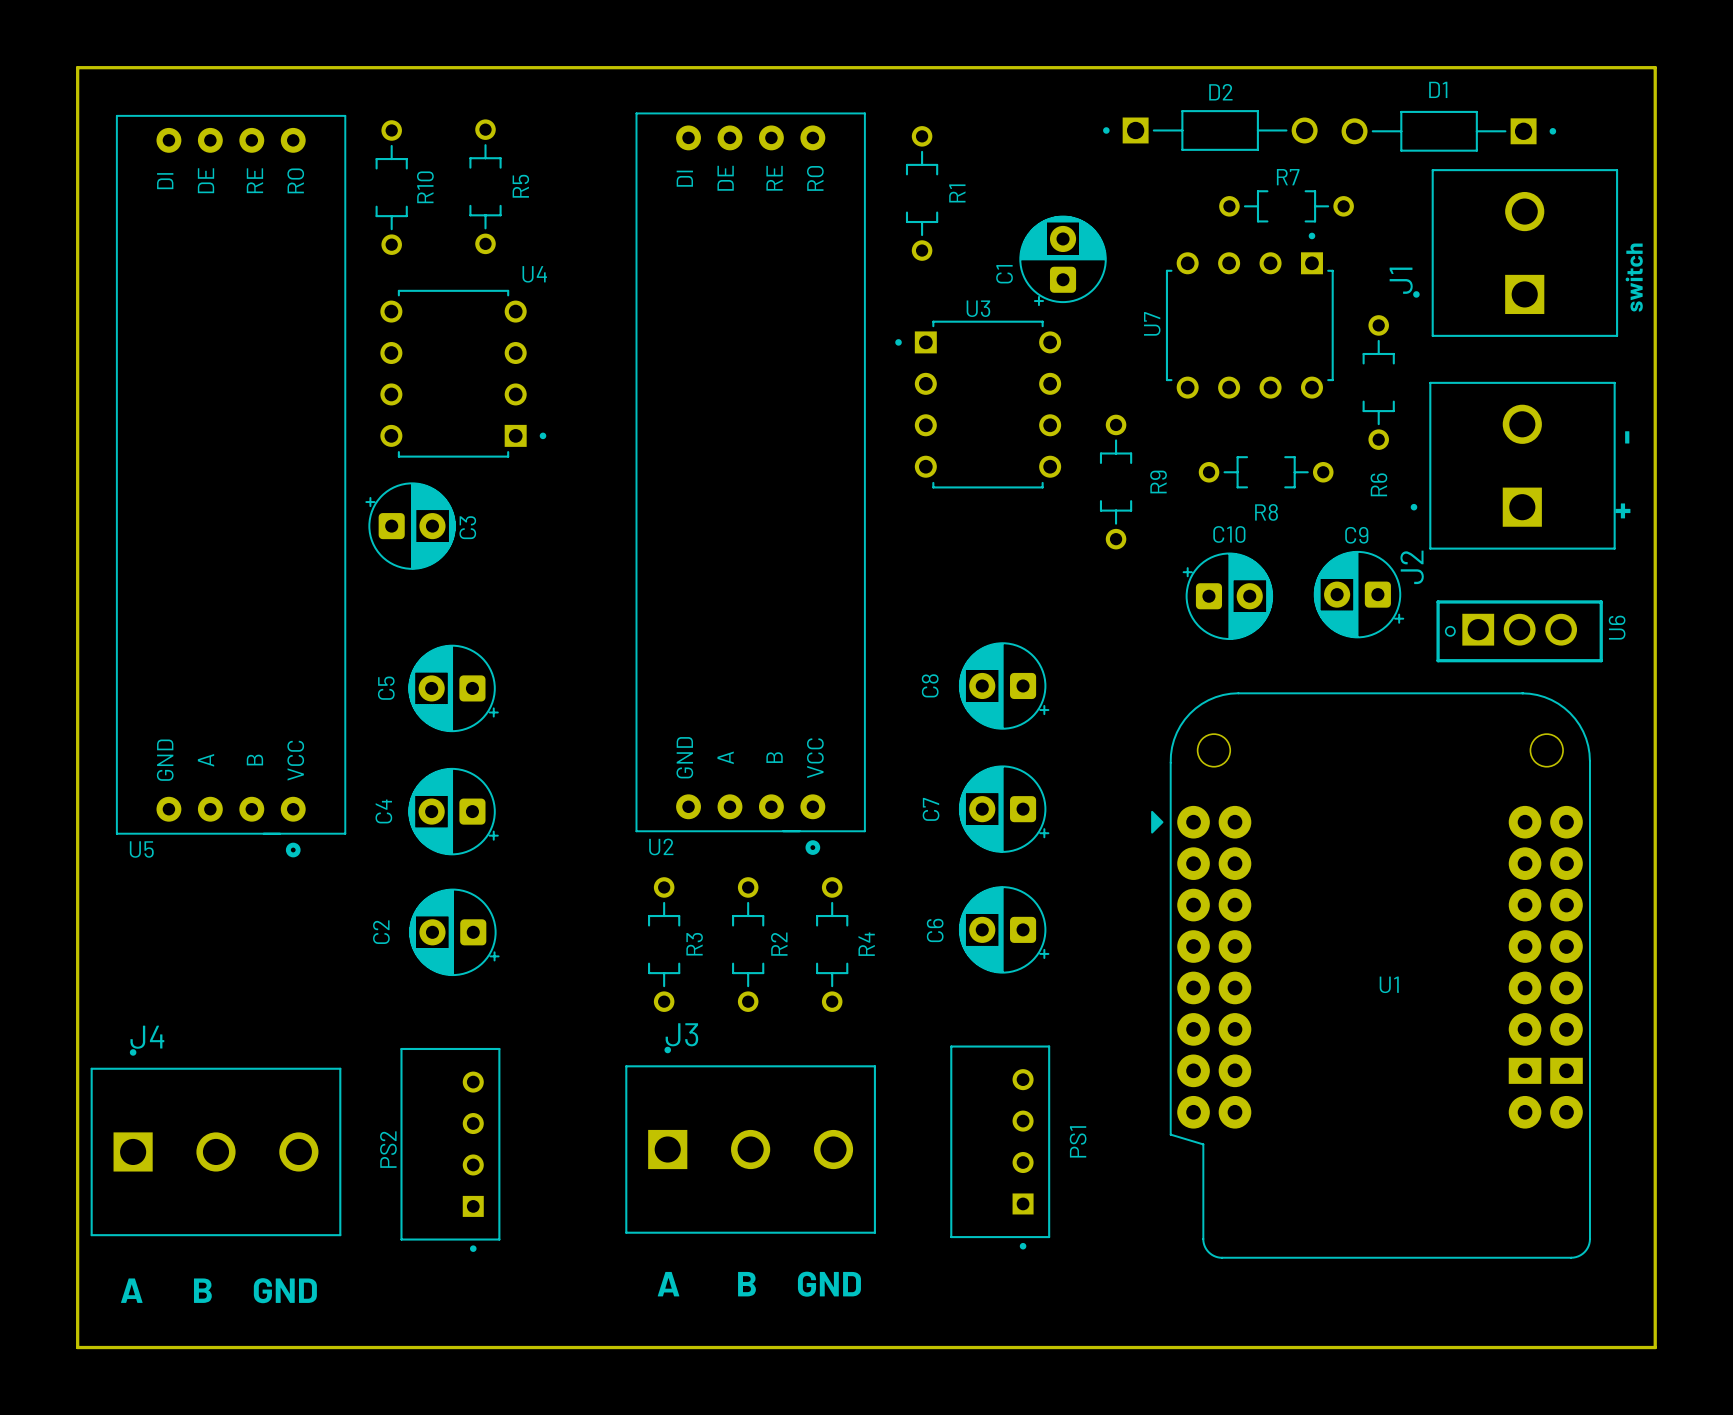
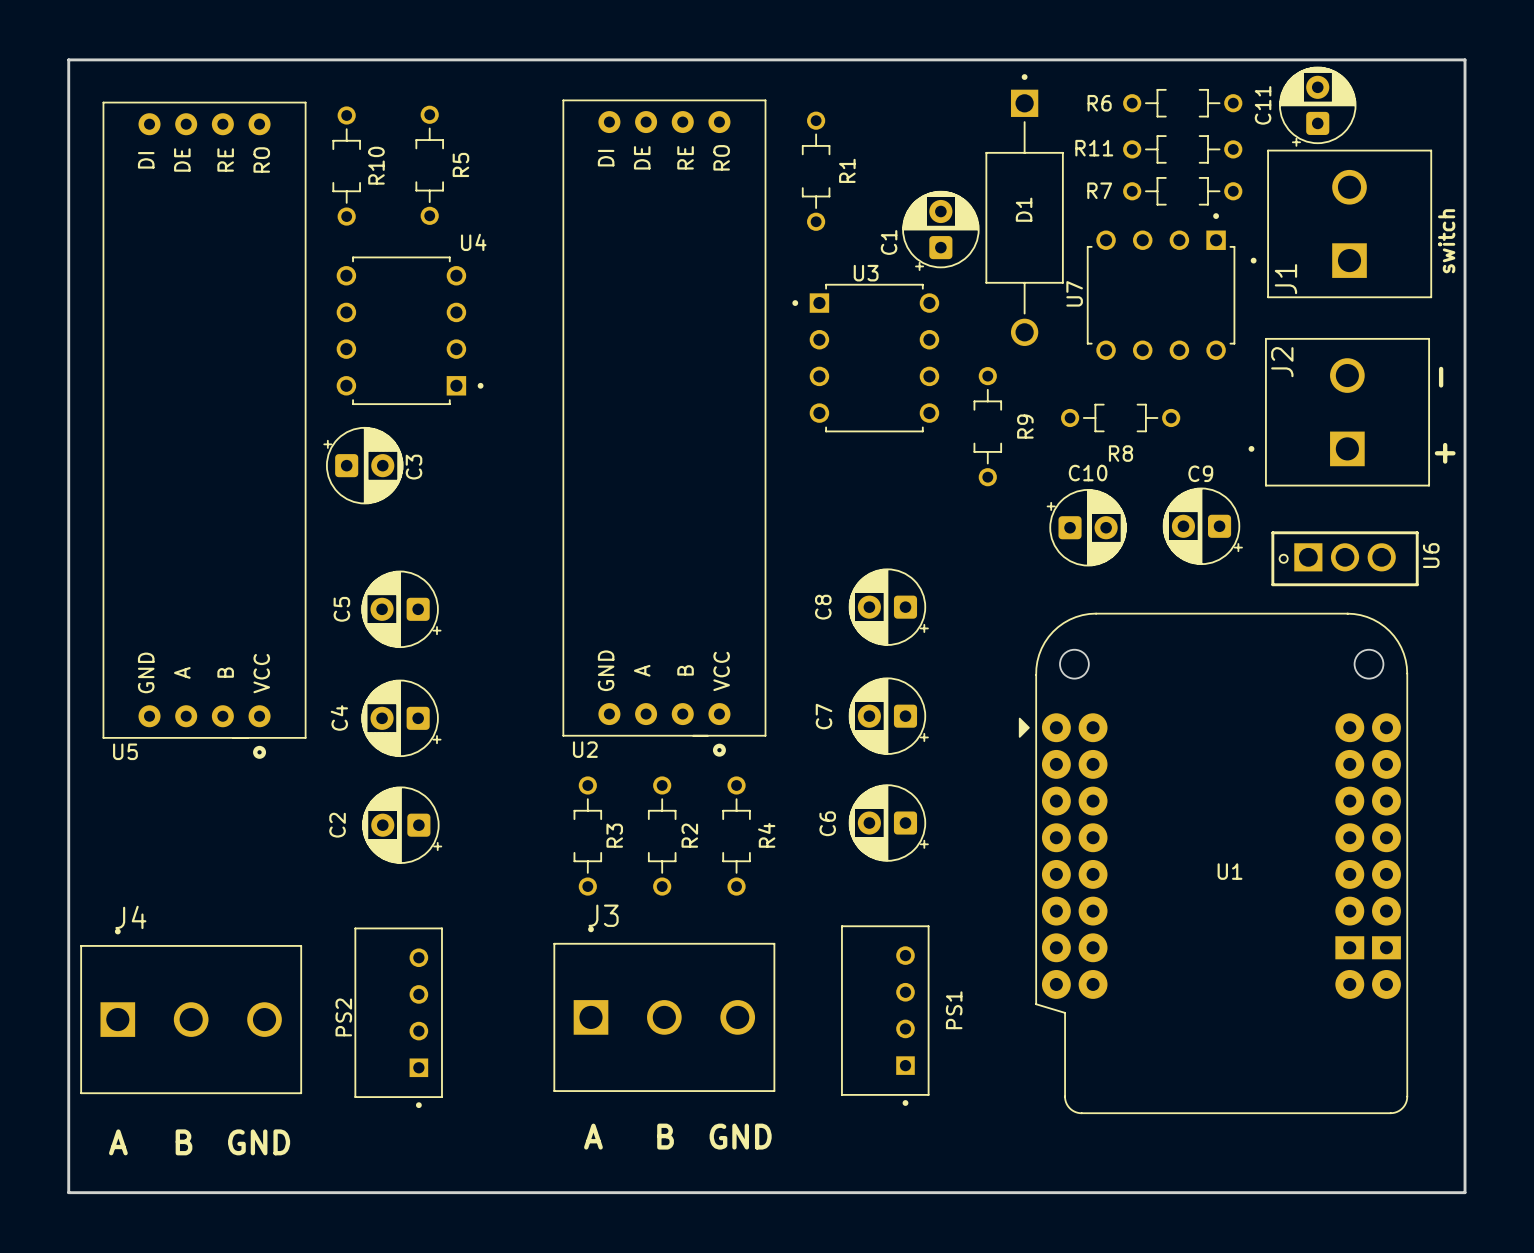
D1 name position: D1 (1438, 89) -> D1 (1024, 209)
D1 footprint: [1341, 110, 1557, 152] -> [985, 74, 1064, 346]
C11: none -> (1317, 106)
D2: (1210, 130) -> none
R11: none -> (1182, 149)
R7 name position: R7 (1288, 177) -> R7 (1099, 190)
R7 position: (1286, 206) -> (1182, 191)
J1 name position: J1 (1401, 280) -> J1 (1285, 279)
U7 position: (1249, 315) -> (1161, 286)
R6 rotation: 0° (1378, 382) -> 90° clockwise (1182, 103)
R6 position: (1378, 382) -> (1182, 103)
J2 name position: J2 (1412, 567) -> J2 (1282, 362)

